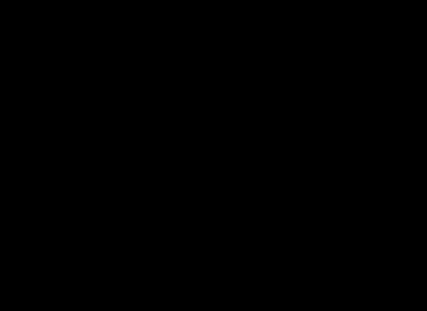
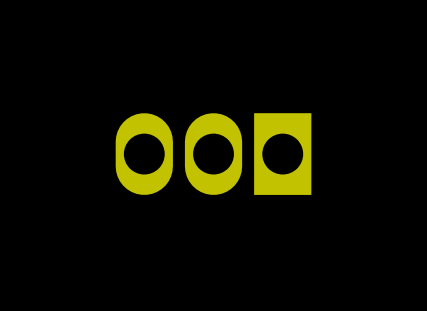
part: none -> (213, 154)

